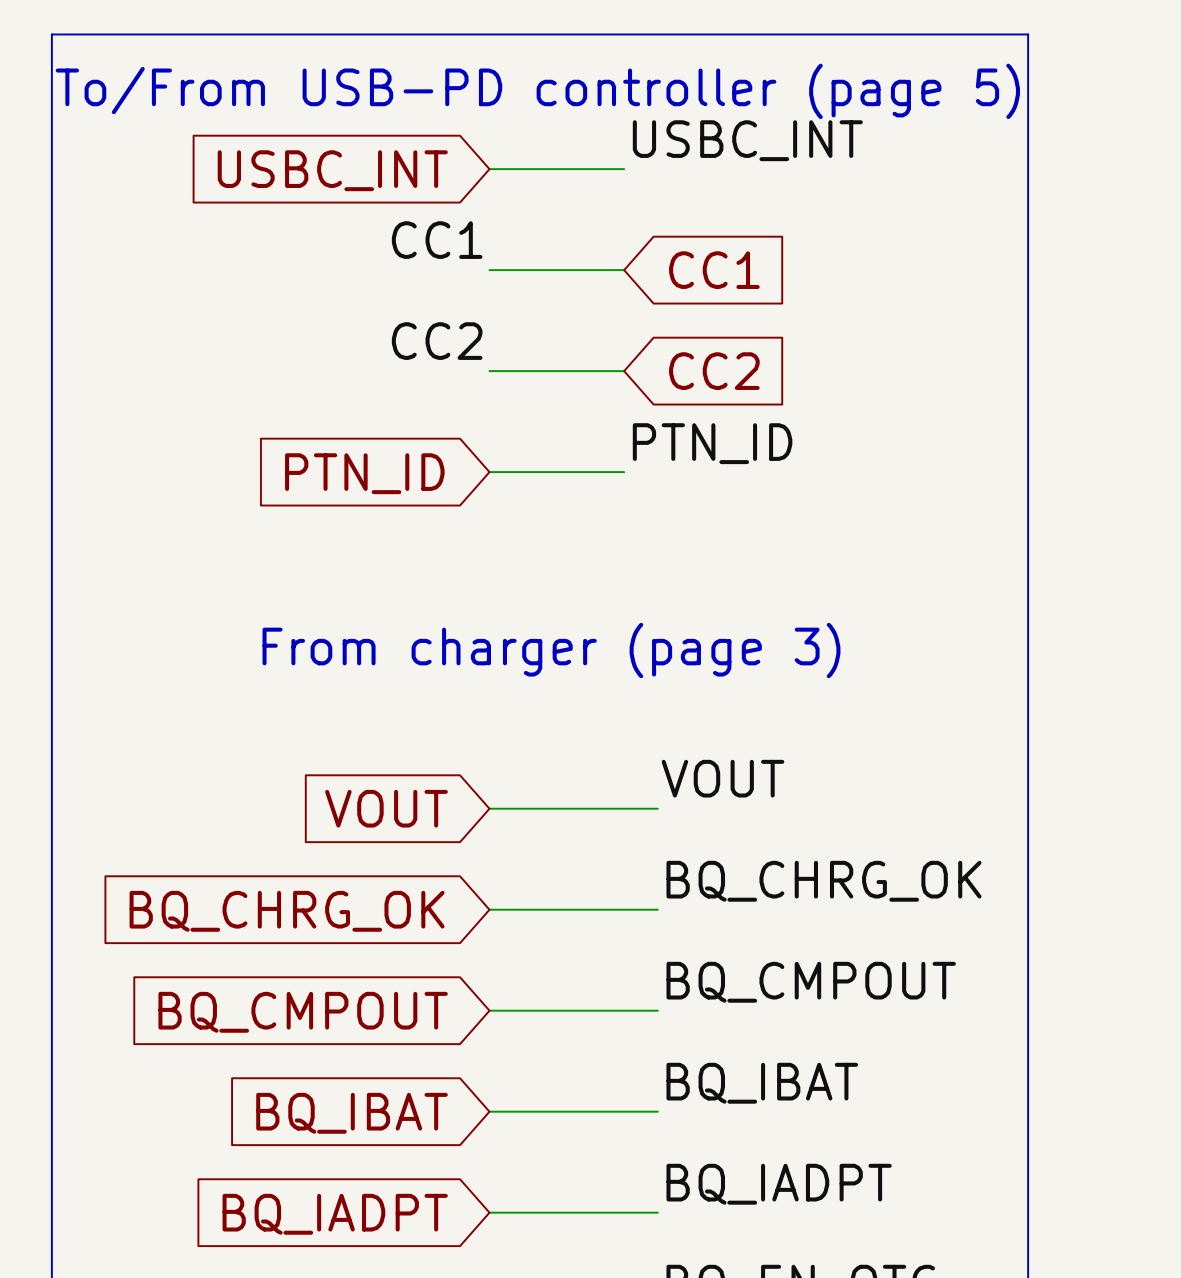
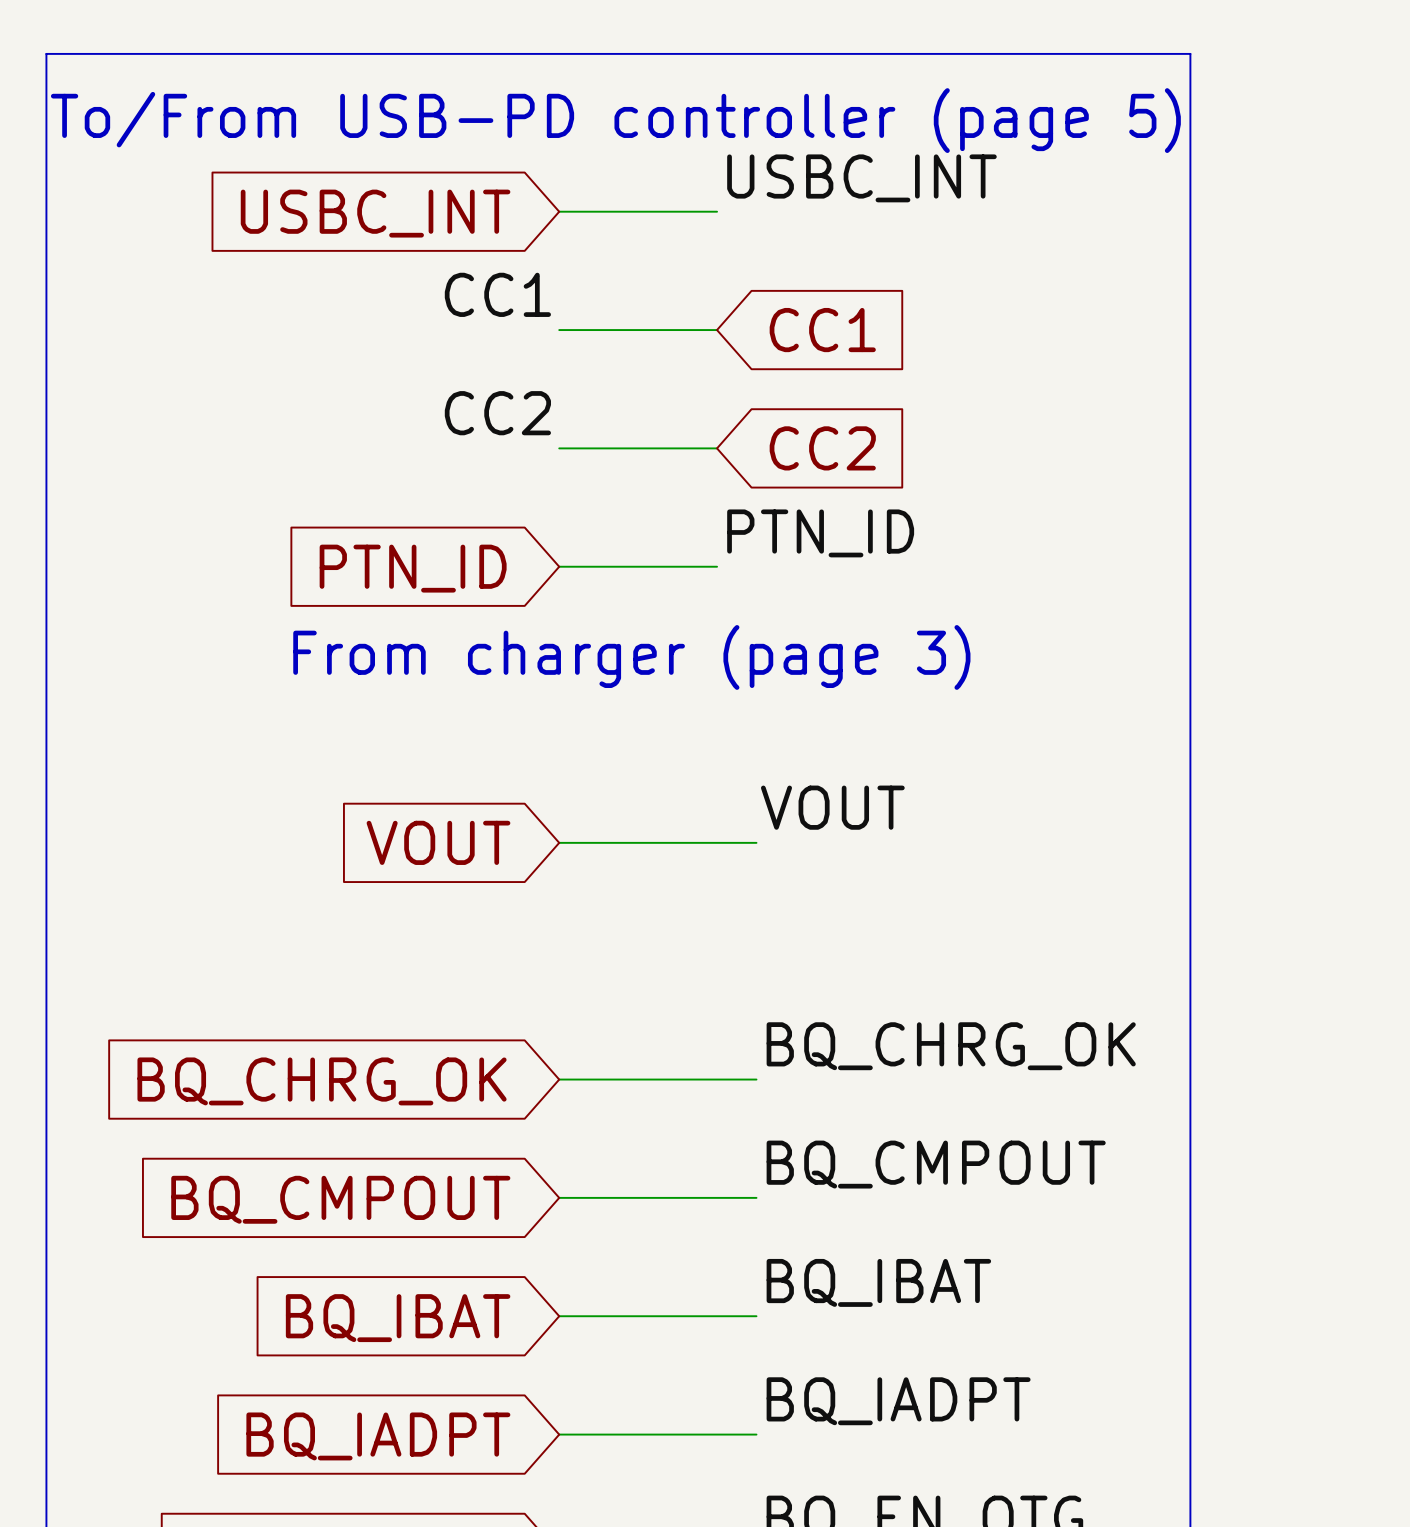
text position: From charger (page 3) (551, 650) -> From charger (page 3) (631, 657)
label position: VOUT (722, 778) -> VOUT (832, 807)
global label position: VOUT (386, 808) -> VOUT (438, 842)
wire: (489, 808) (657, 808) -> (559, 842) (756, 842)

